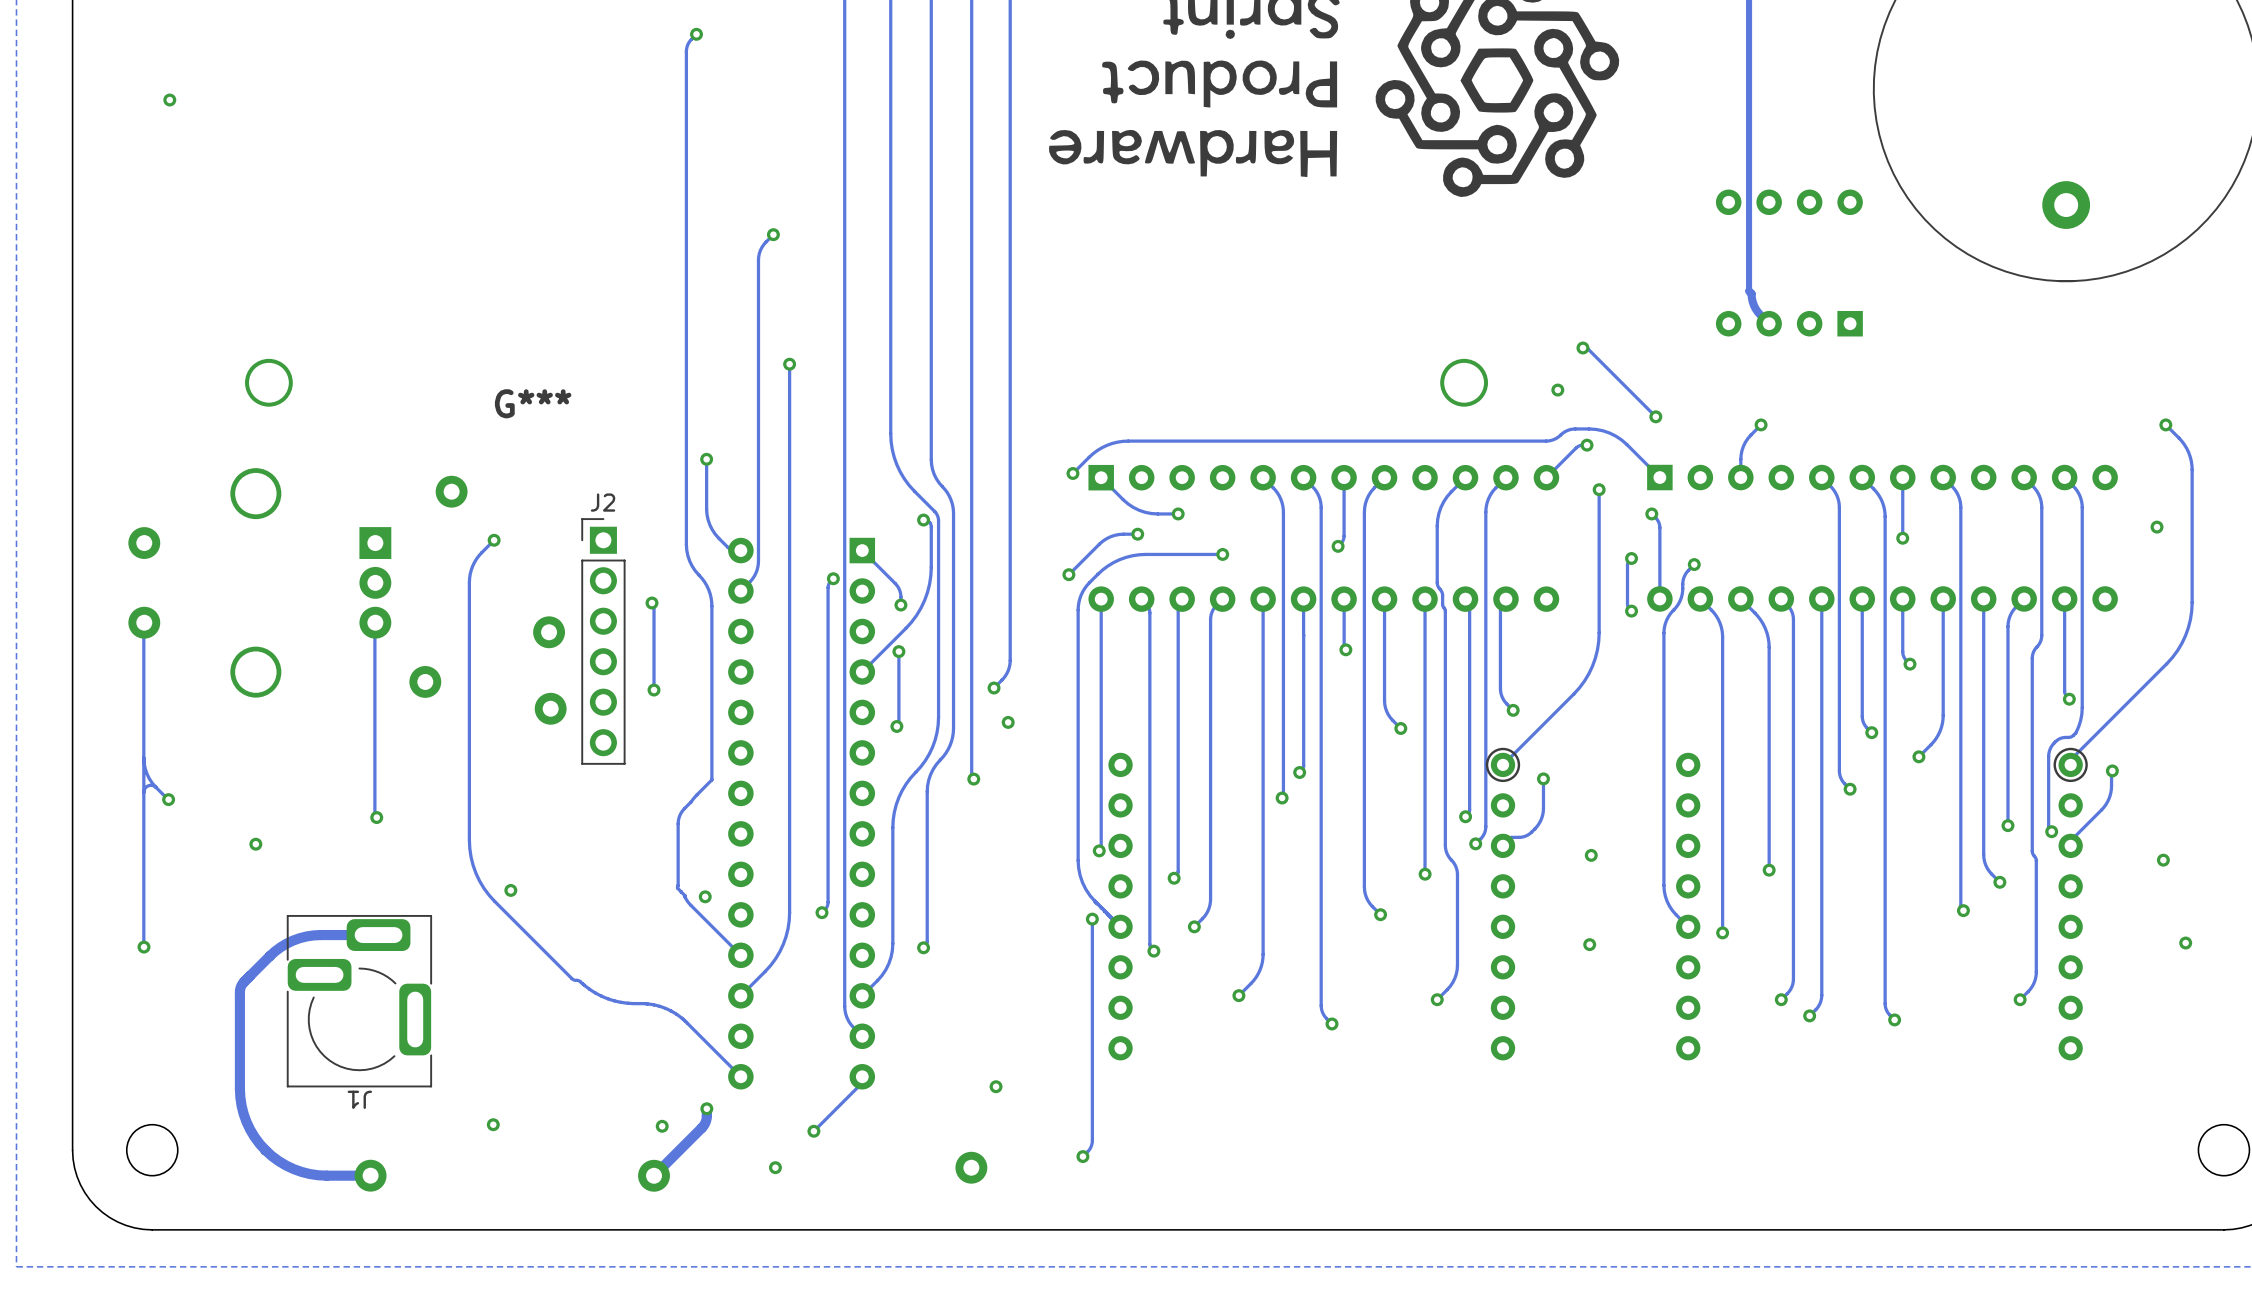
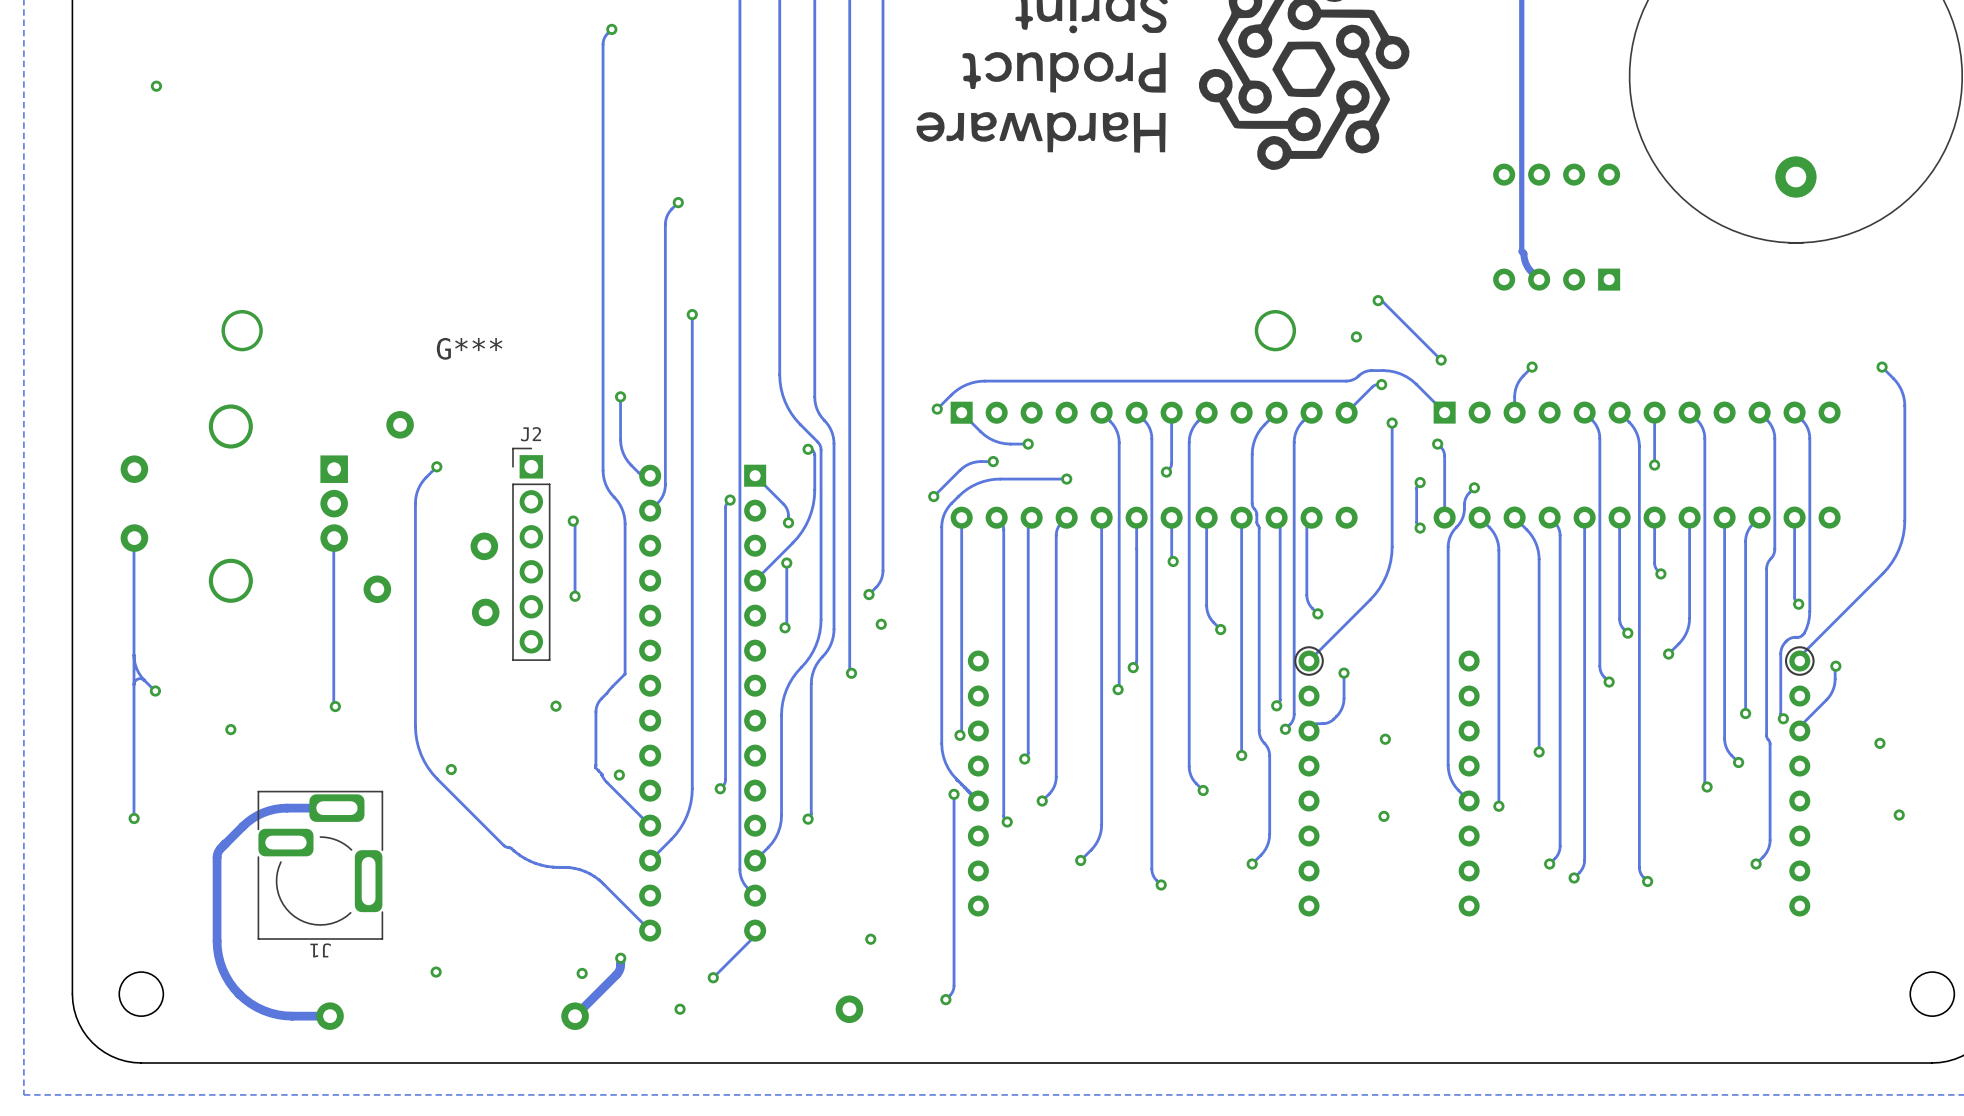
via: (2157, 527) -> none
via: none -> (555, 706)

